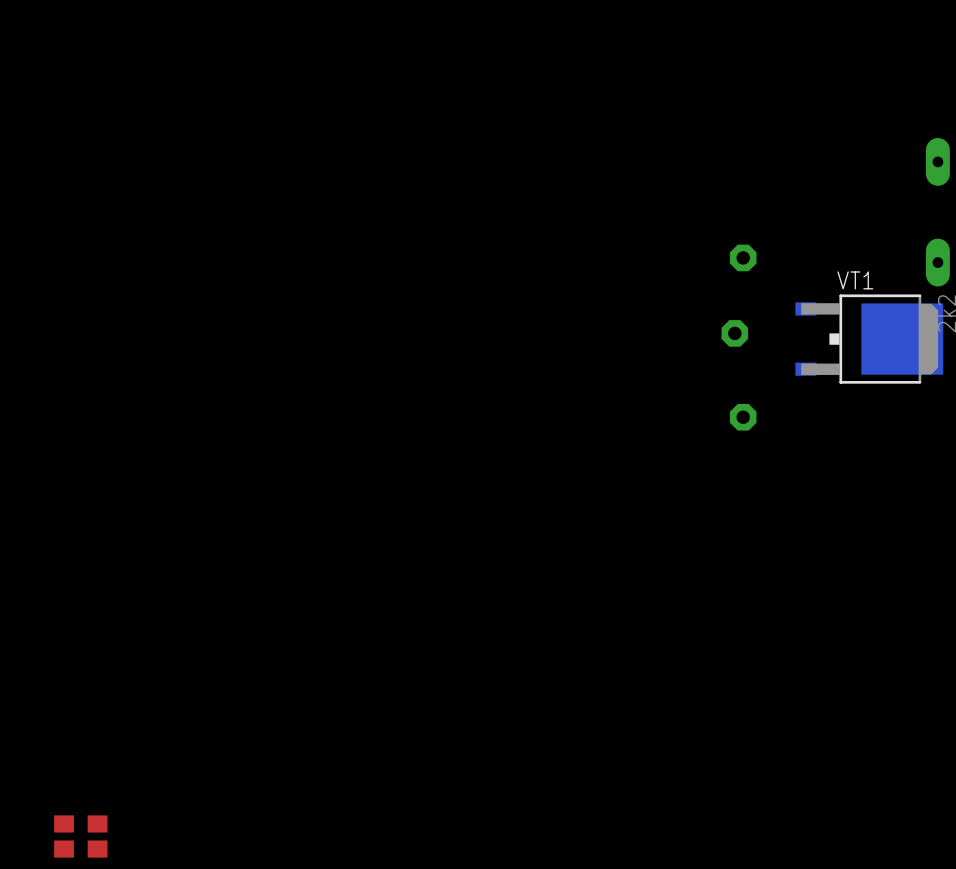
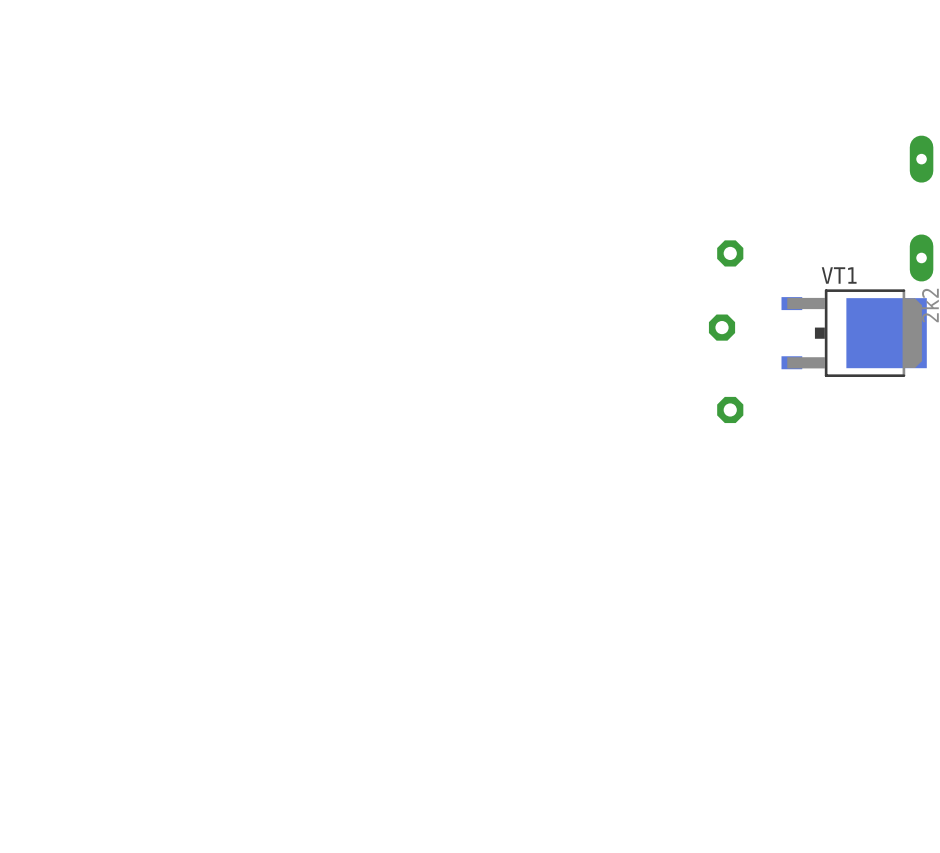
part: (64, 836) -> none
part: (97, 836) -> none

